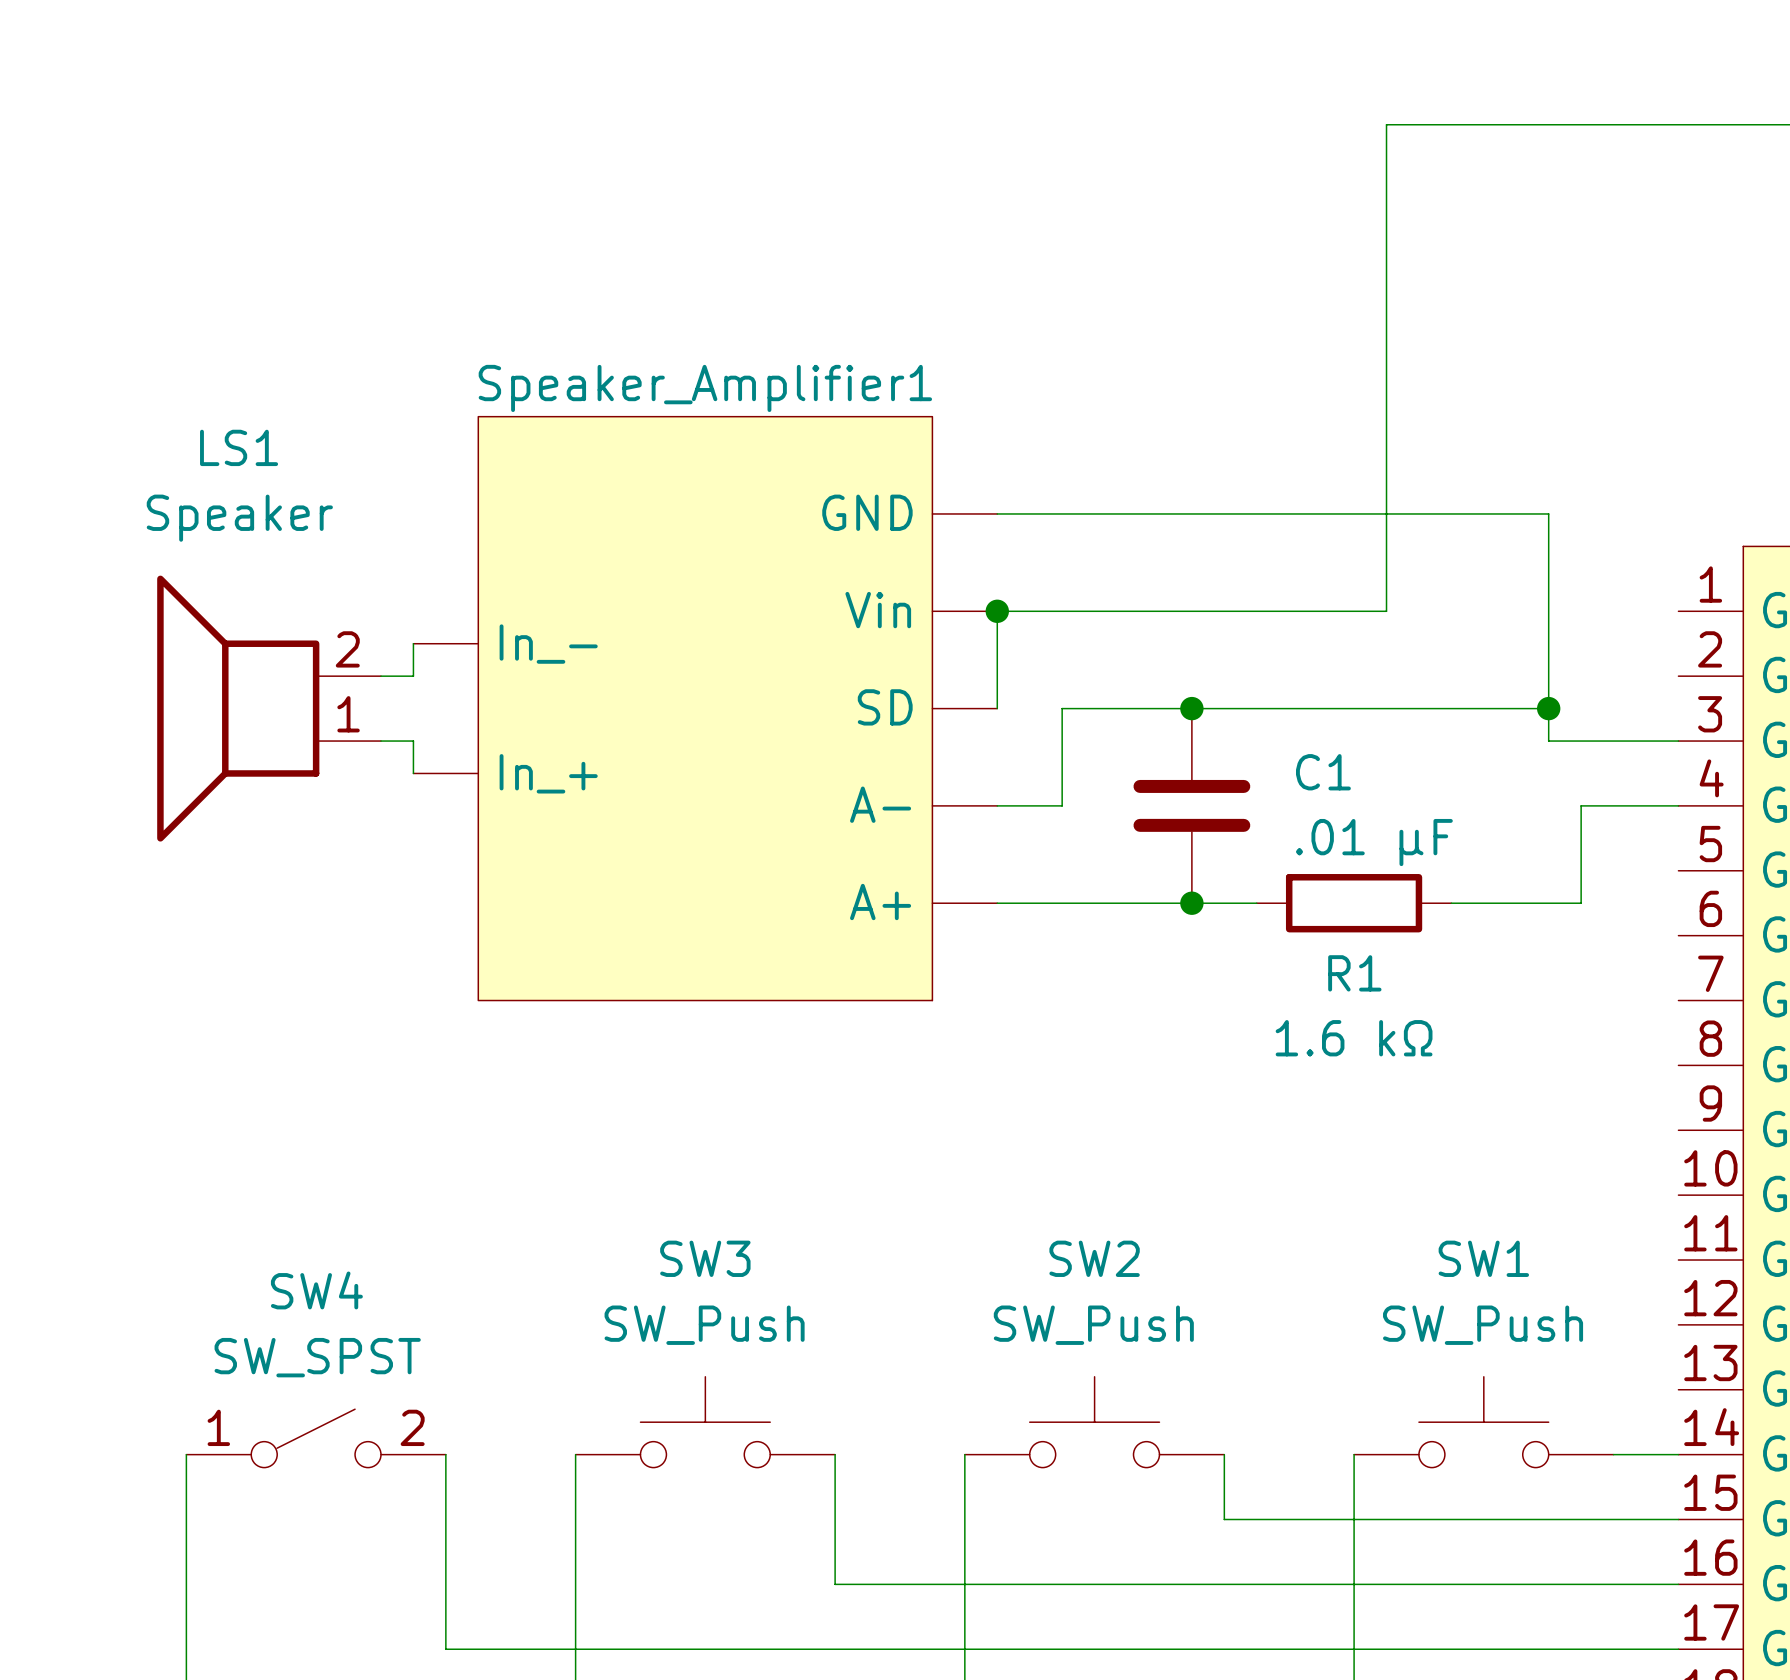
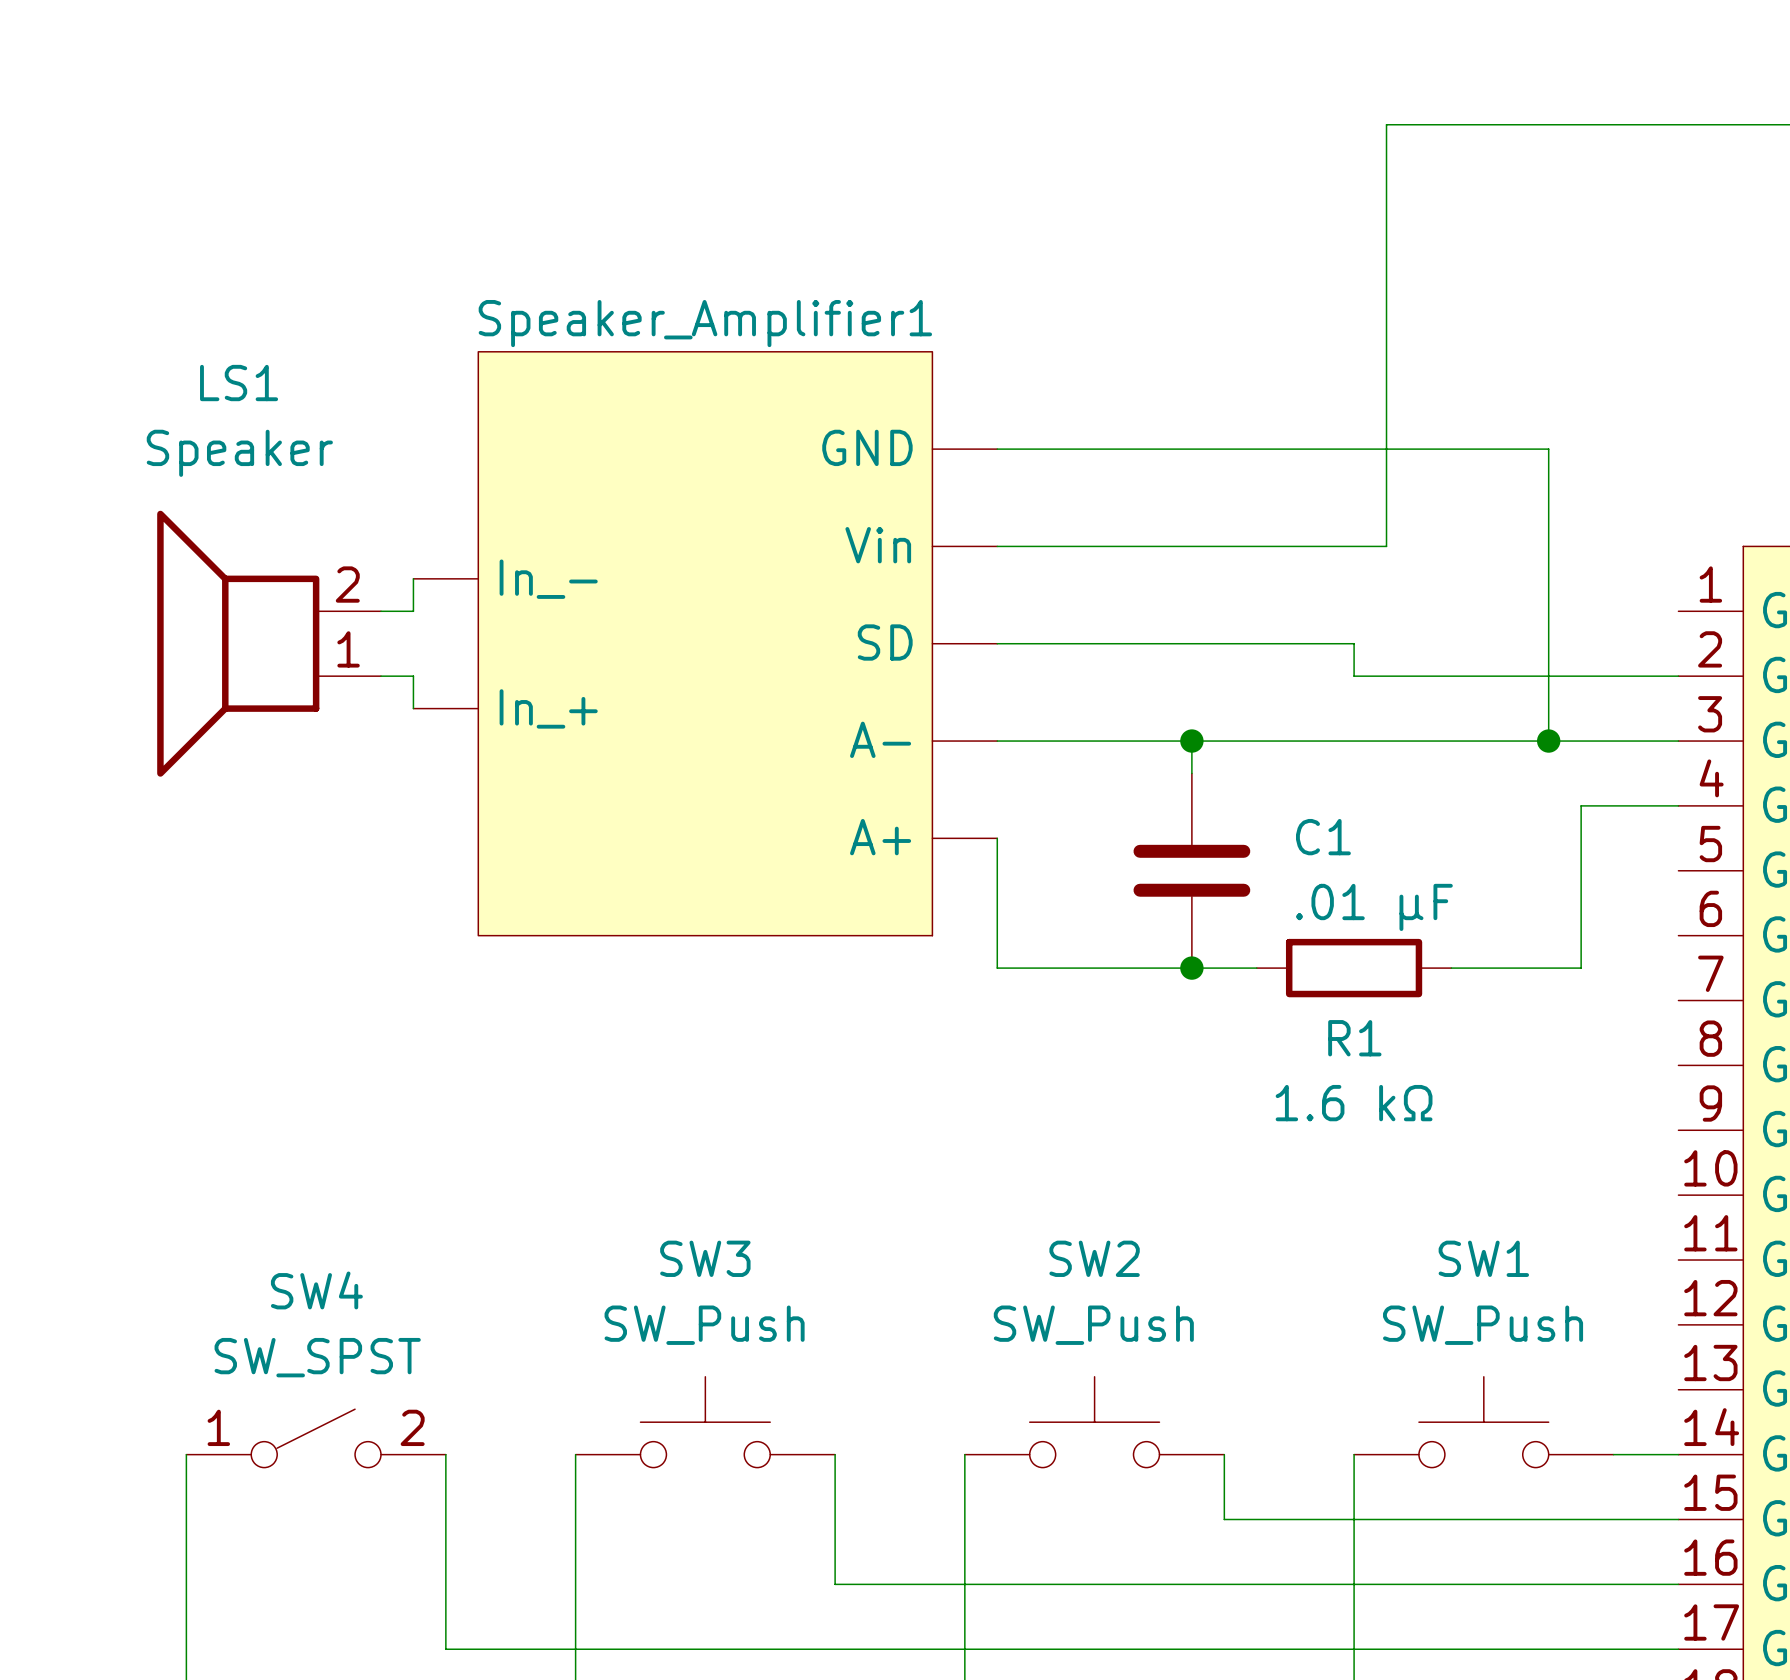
wire: (997, 513) (1548, 513) -> (997, 449) (1548, 449) (1548, 513)
wire: (1386, 546) (1386, 611) (997, 611) (997, 708) -> (1386, 546) (997, 546)
wire: none -> (413, 578) (413, 611) (380, 611)
junction: (997, 611) -> none
wire: (413, 643) (413, 676) -> (413, 708) (413, 676)
wire: none -> (997, 643) (1354, 643) (1354, 676) (1678, 676)
LS1 position: (269, 708) -> (269, 643)
Speaker_Amplifier1 position: (705, 708) -> (705, 643)
junction position: (1191, 708) -> (1191, 741)
wire: (1548, 708) (1062, 708) (1062, 805) (997, 805) -> none
junction position: (1548, 708) -> (1548, 741)
wire: (380, 741) (413, 741) (413, 773) -> none
wire: none -> (997, 741) (1548, 741)
C1 position: (1191, 805) -> (1191, 870)
wire: none -> (997, 838) (997, 968) (1256, 968)
wire: (997, 903) (1256, 903) -> none
junction position: (1191, 903) -> (1191, 968)
R1 position: (1354, 903) -> (1354, 968)
wire: (1451, 903) (1581, 903) -> (1451, 968) (1581, 968) (1581, 903)

